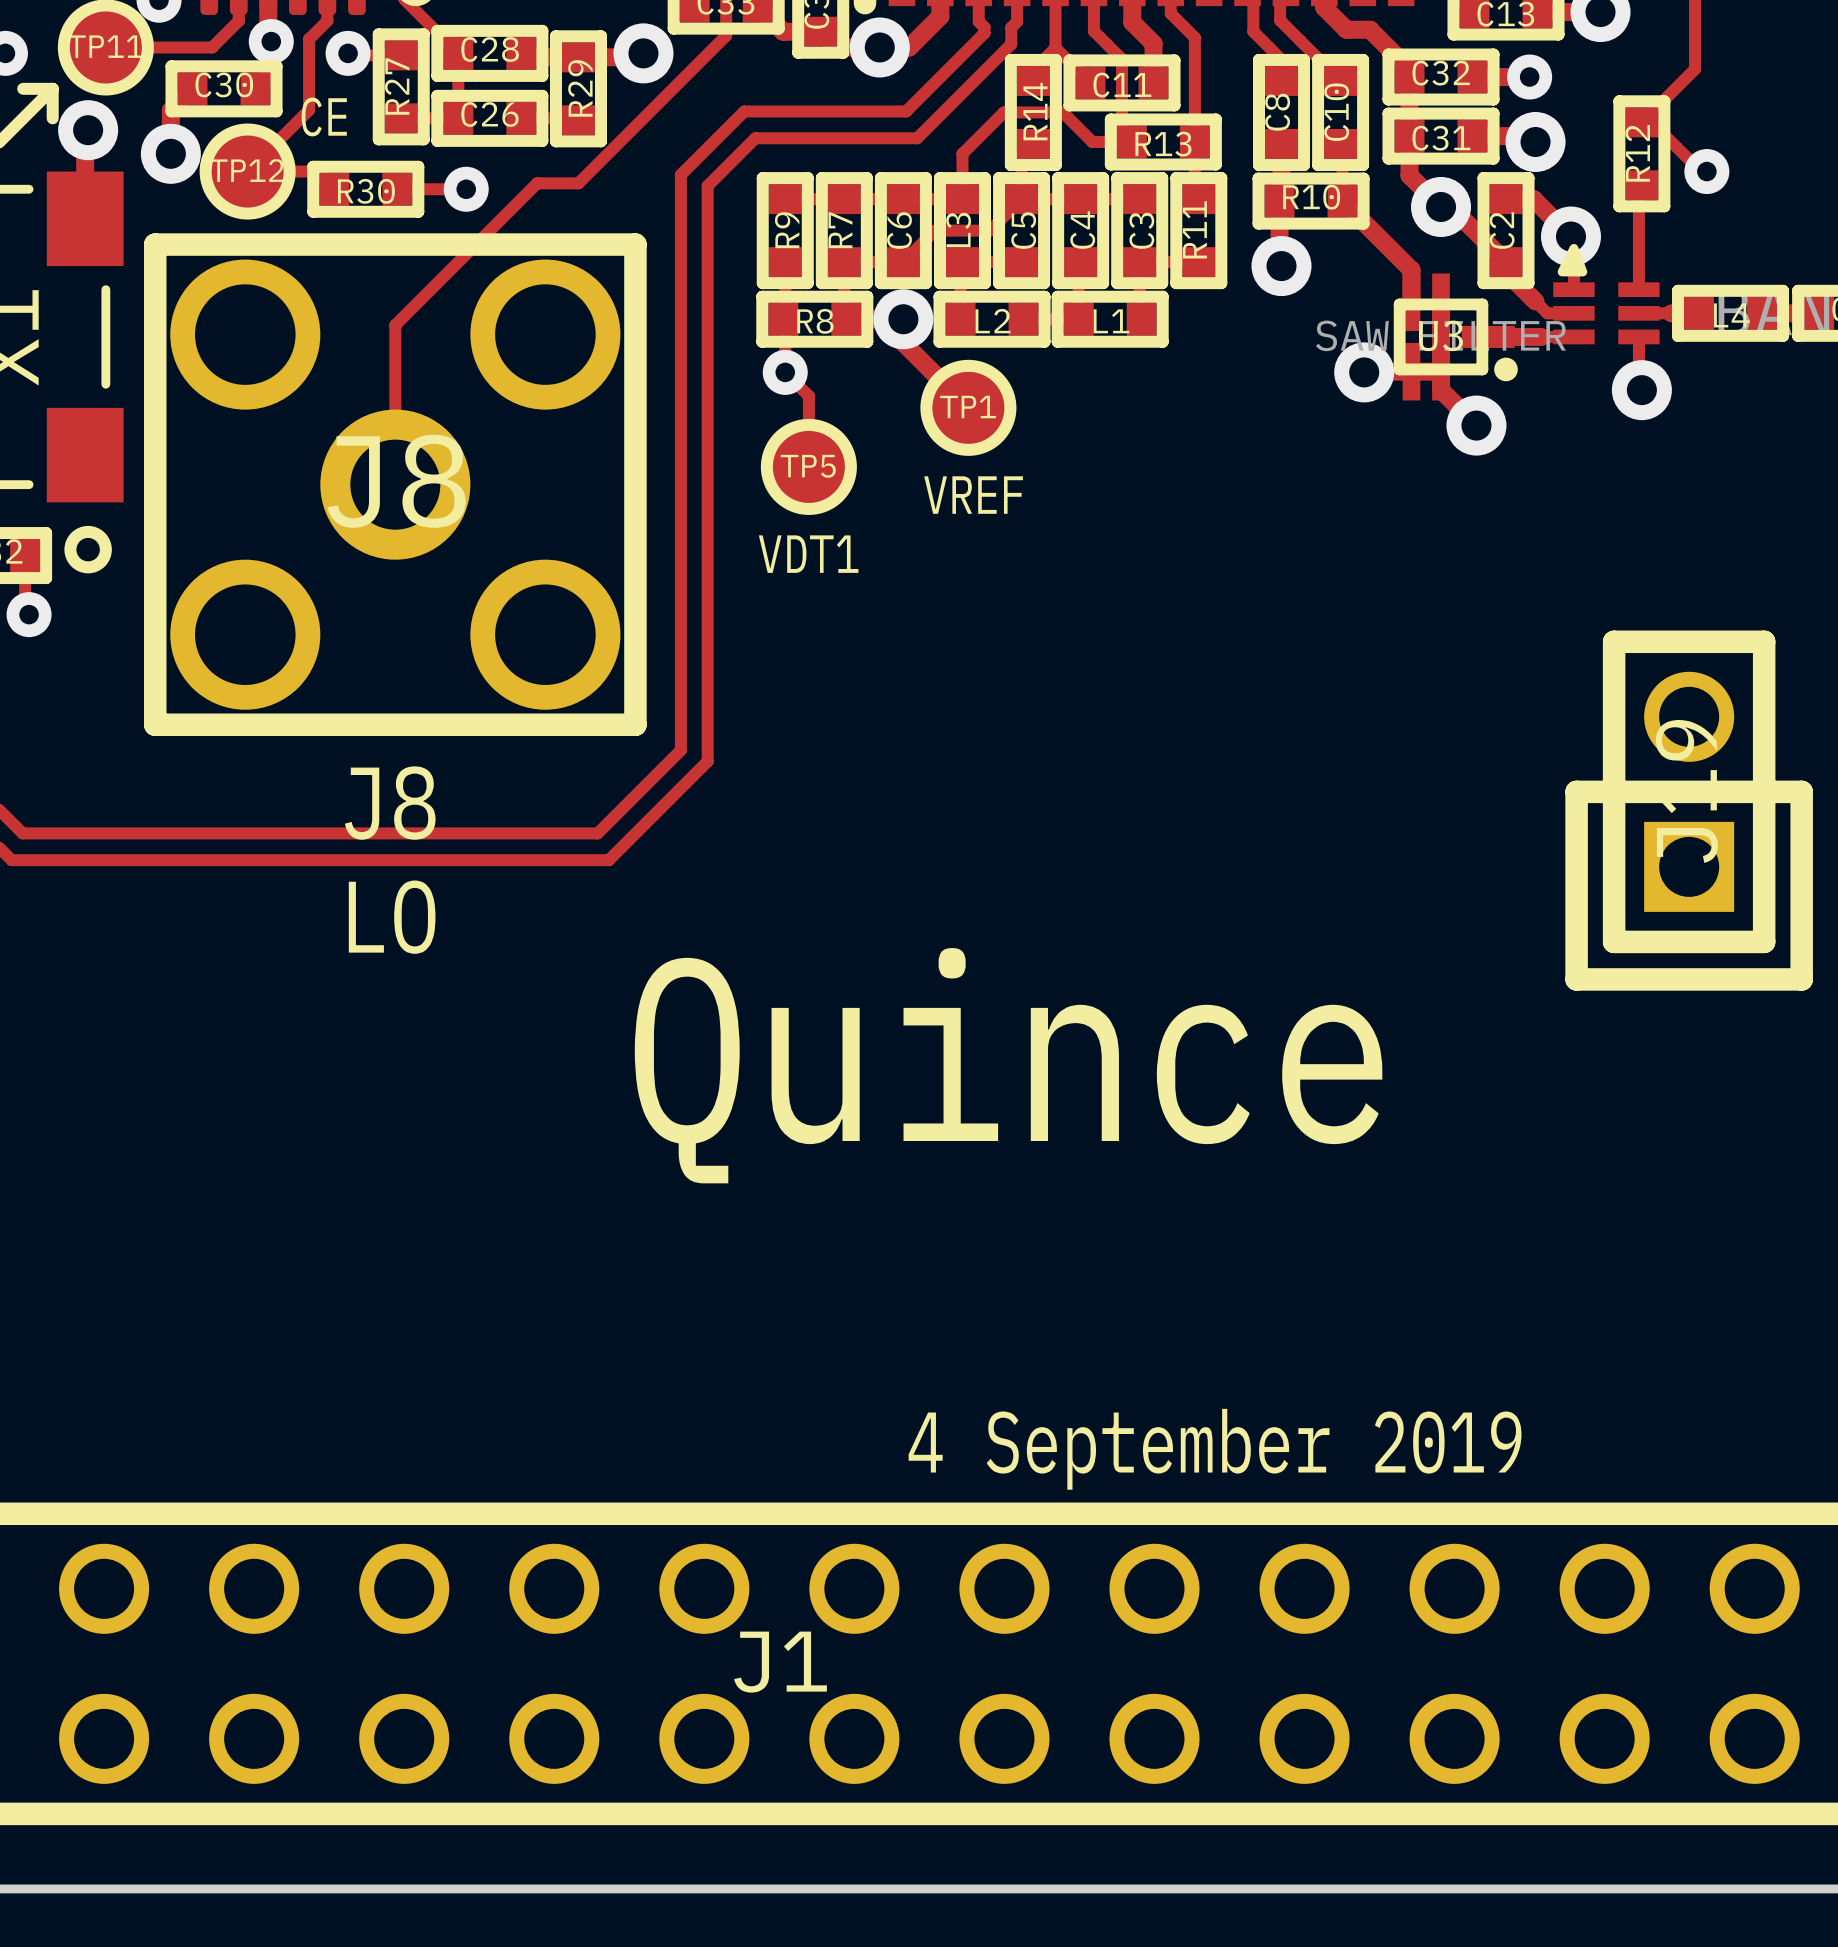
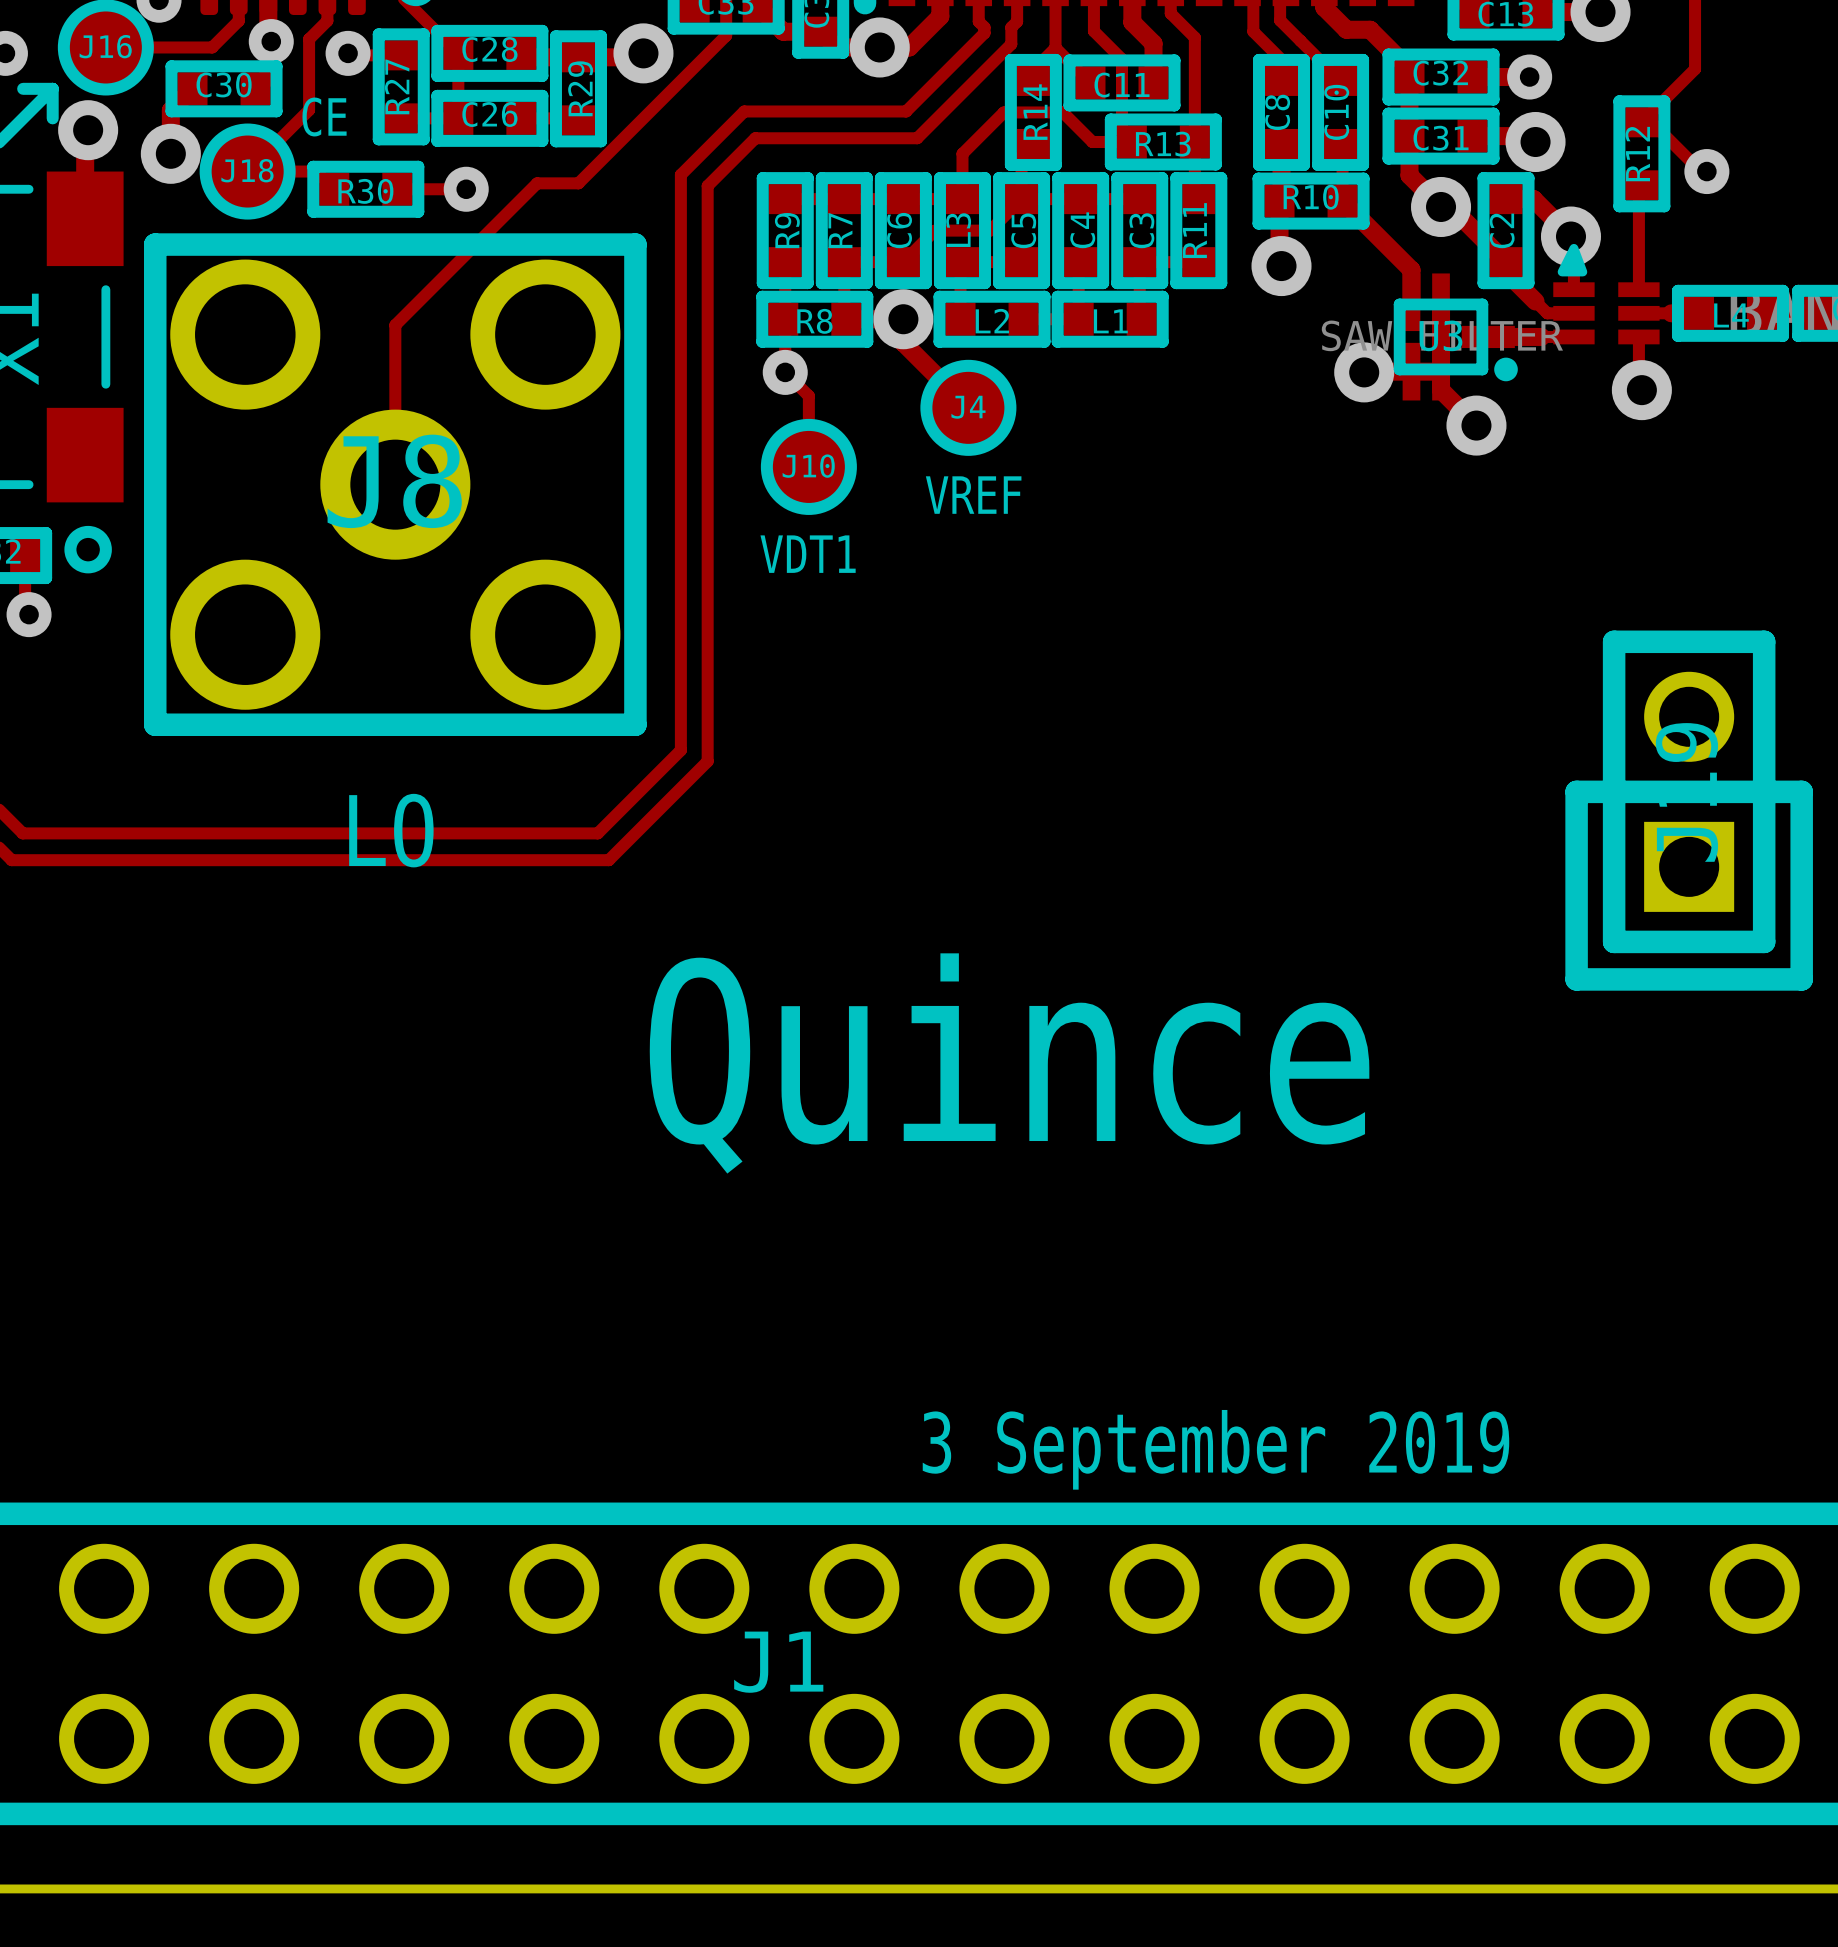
TP11 name: TP11 (105, 46) -> J16 (105, 46)
TP12 name: TP12 (247, 170) -> J18 (247, 170)
TP1 name: TP1 (968, 407) -> J4 (968, 407)
TP5 name: TP5 (808, 466) -> J10 (808, 466)
text: J8 (390, 803) -> LO (391, 830)
text: LO (392, 917) -> none
text: 4 September 2019 (1215, 1449) -> 3 September 2019 (1215, 1449)

